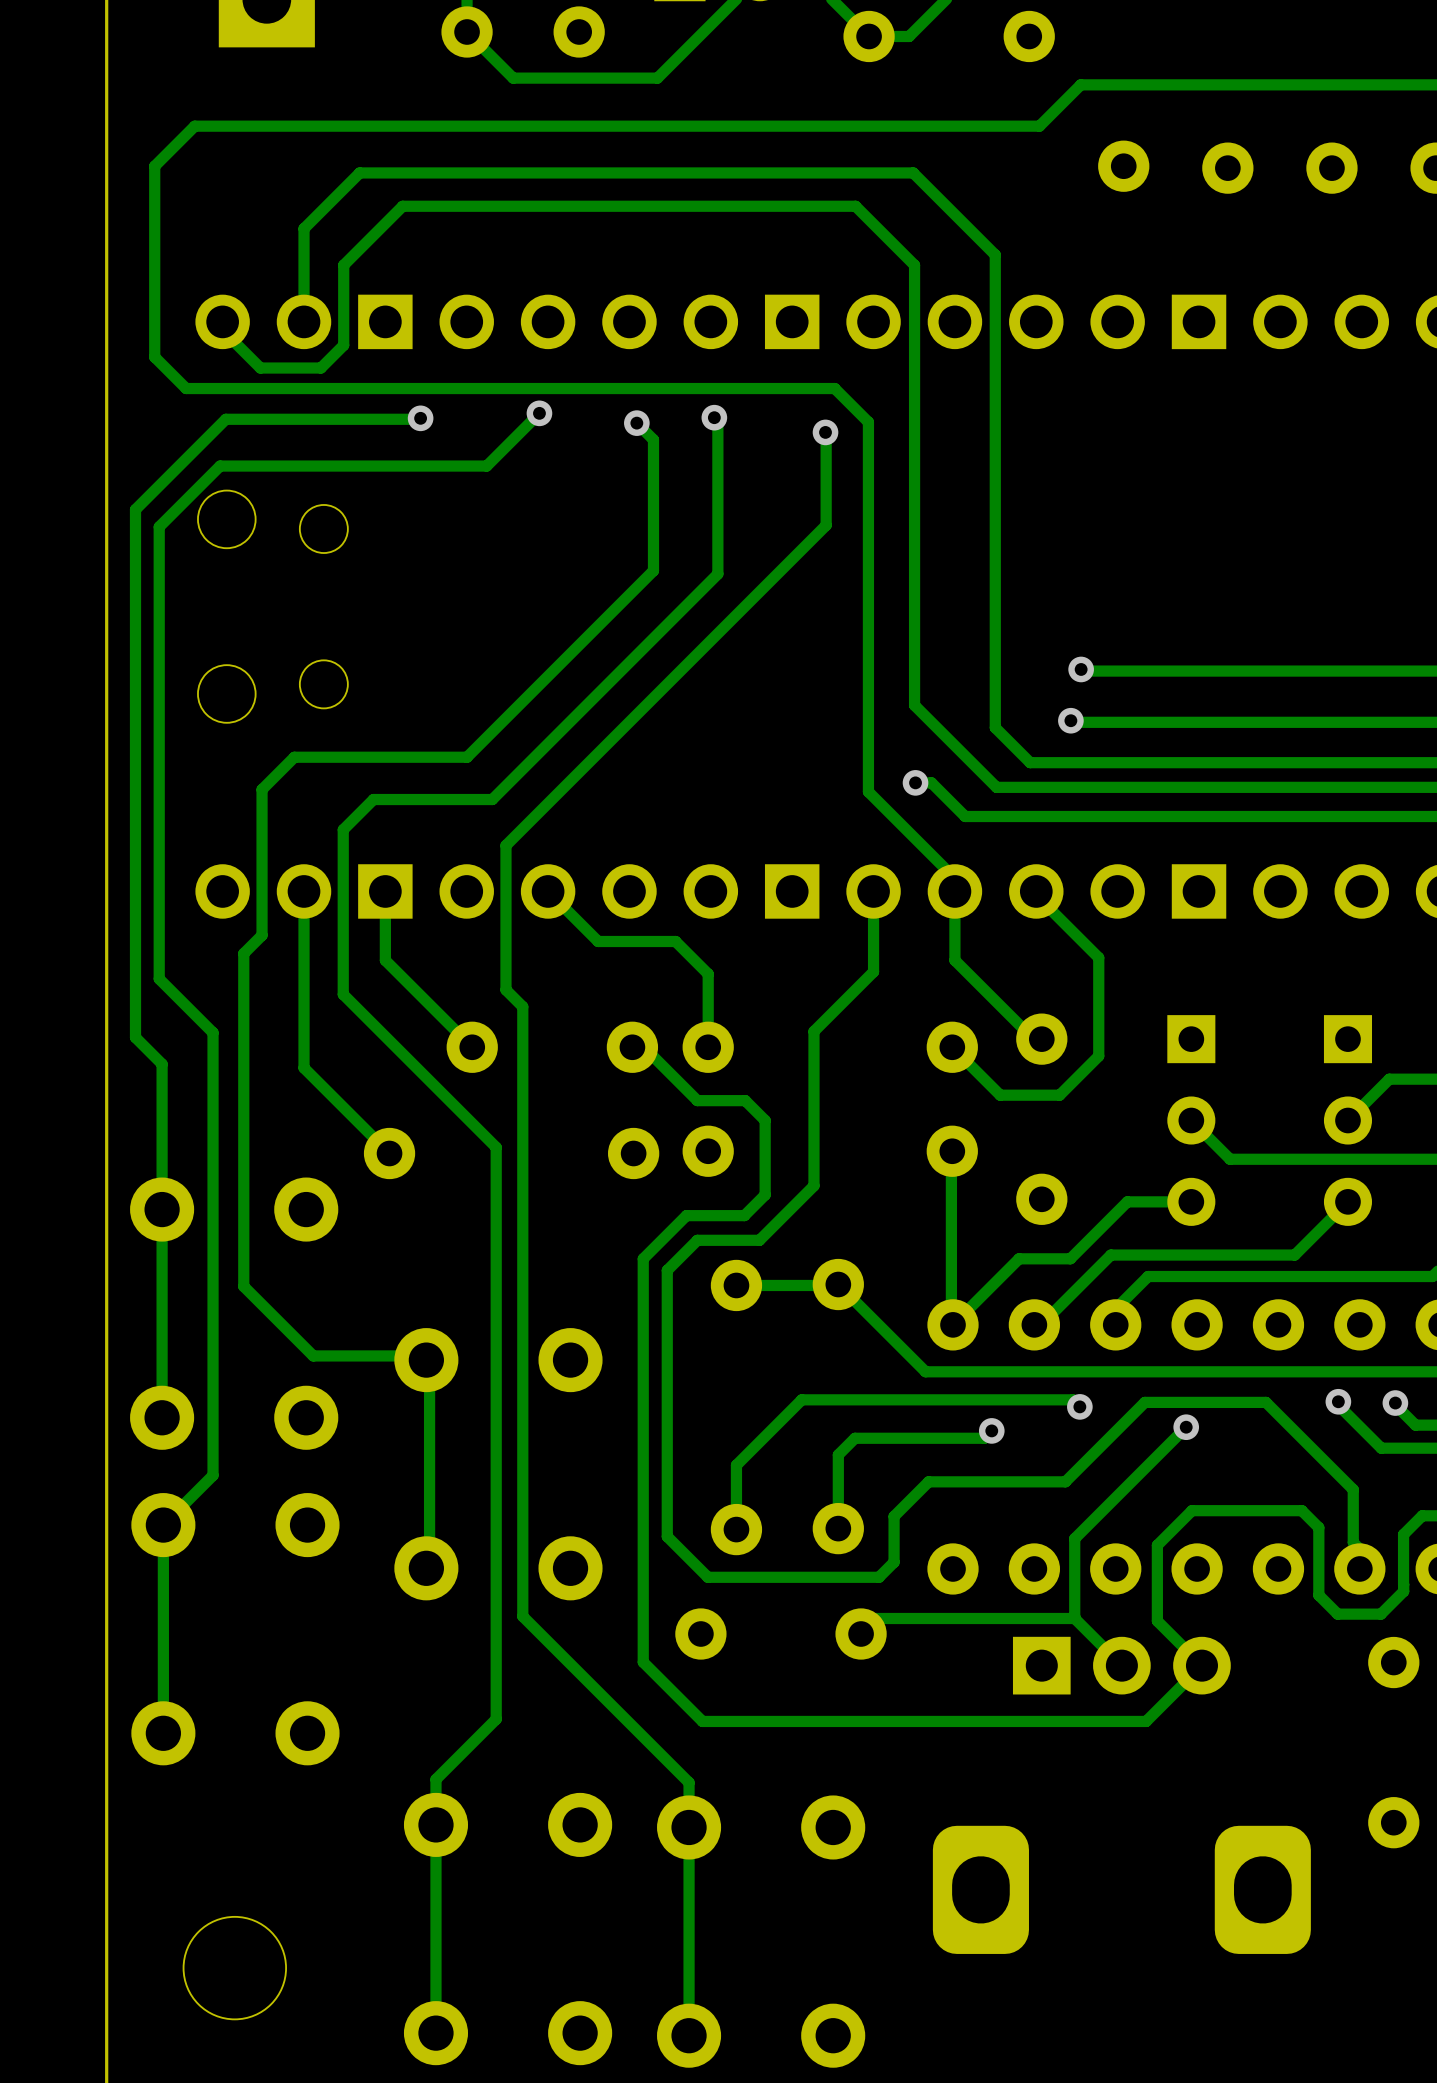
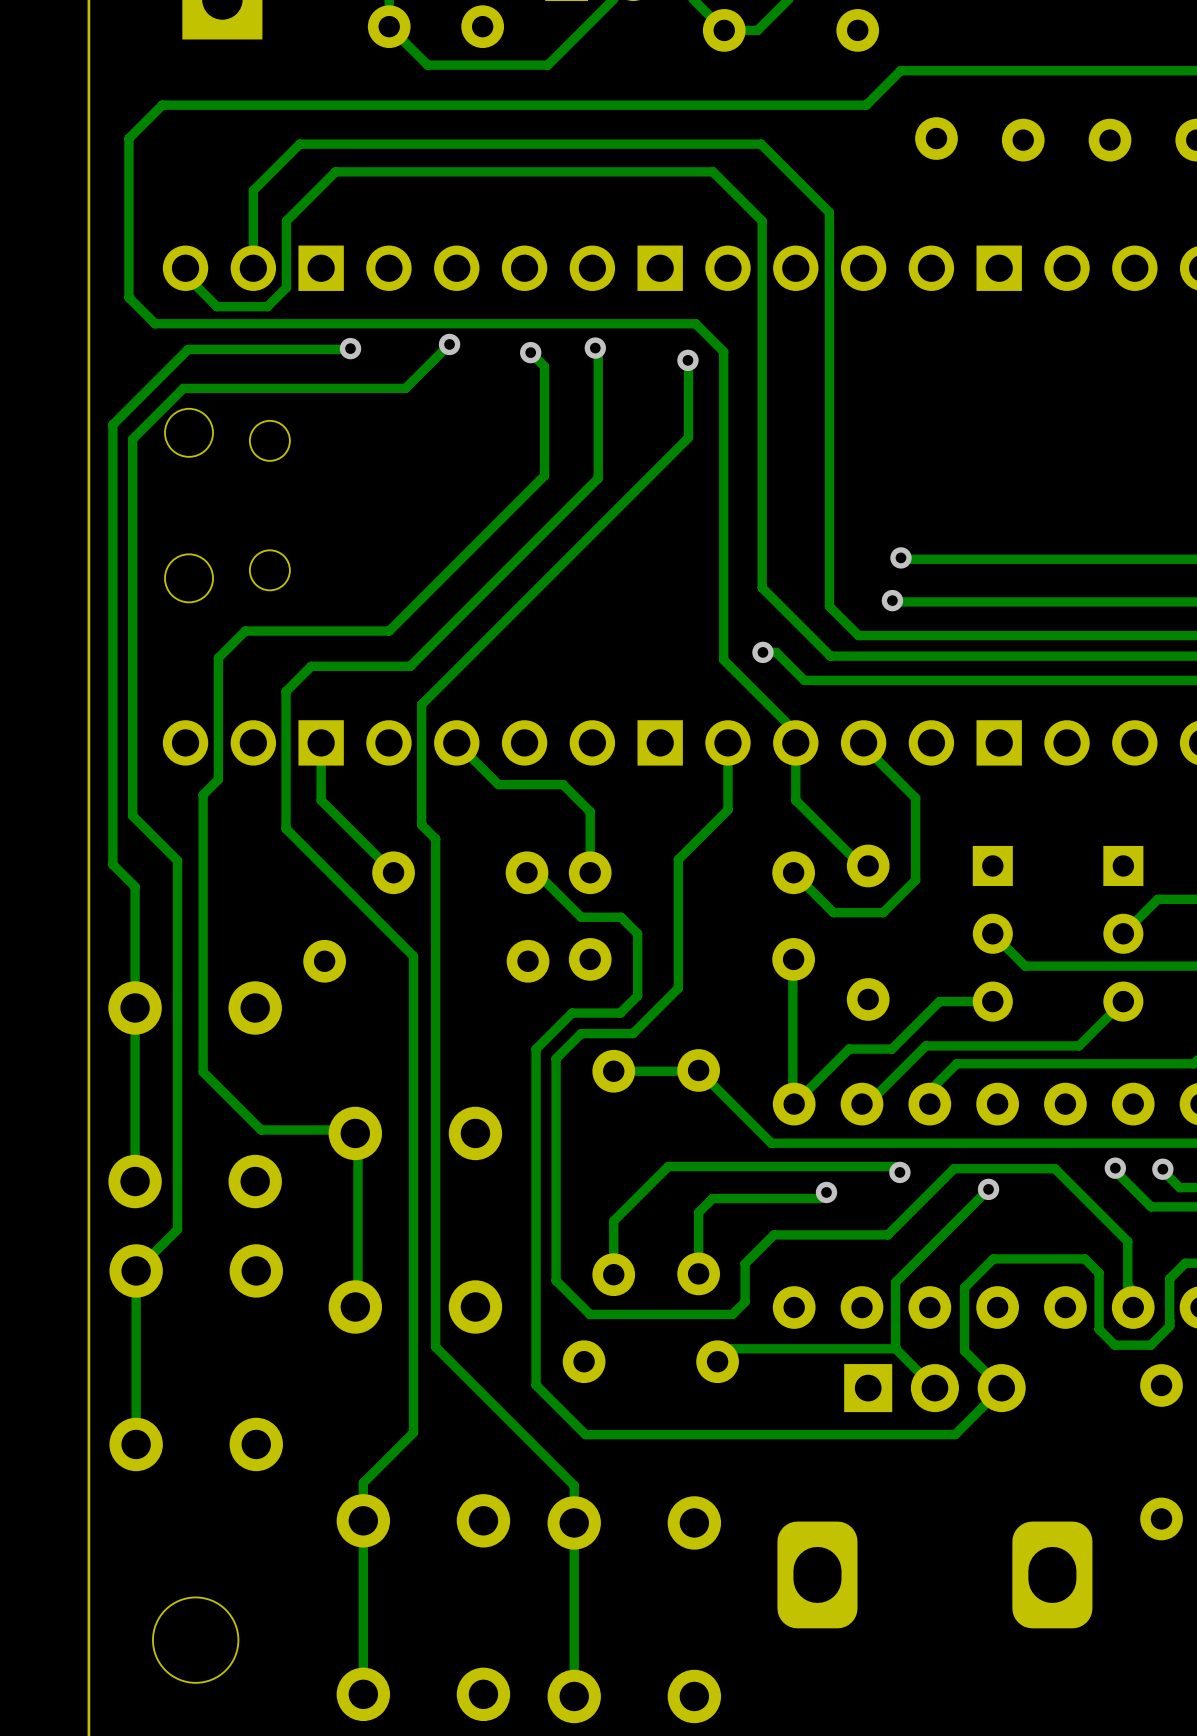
track: (304, 891) (304, 1067) (389, 1153) -> none

